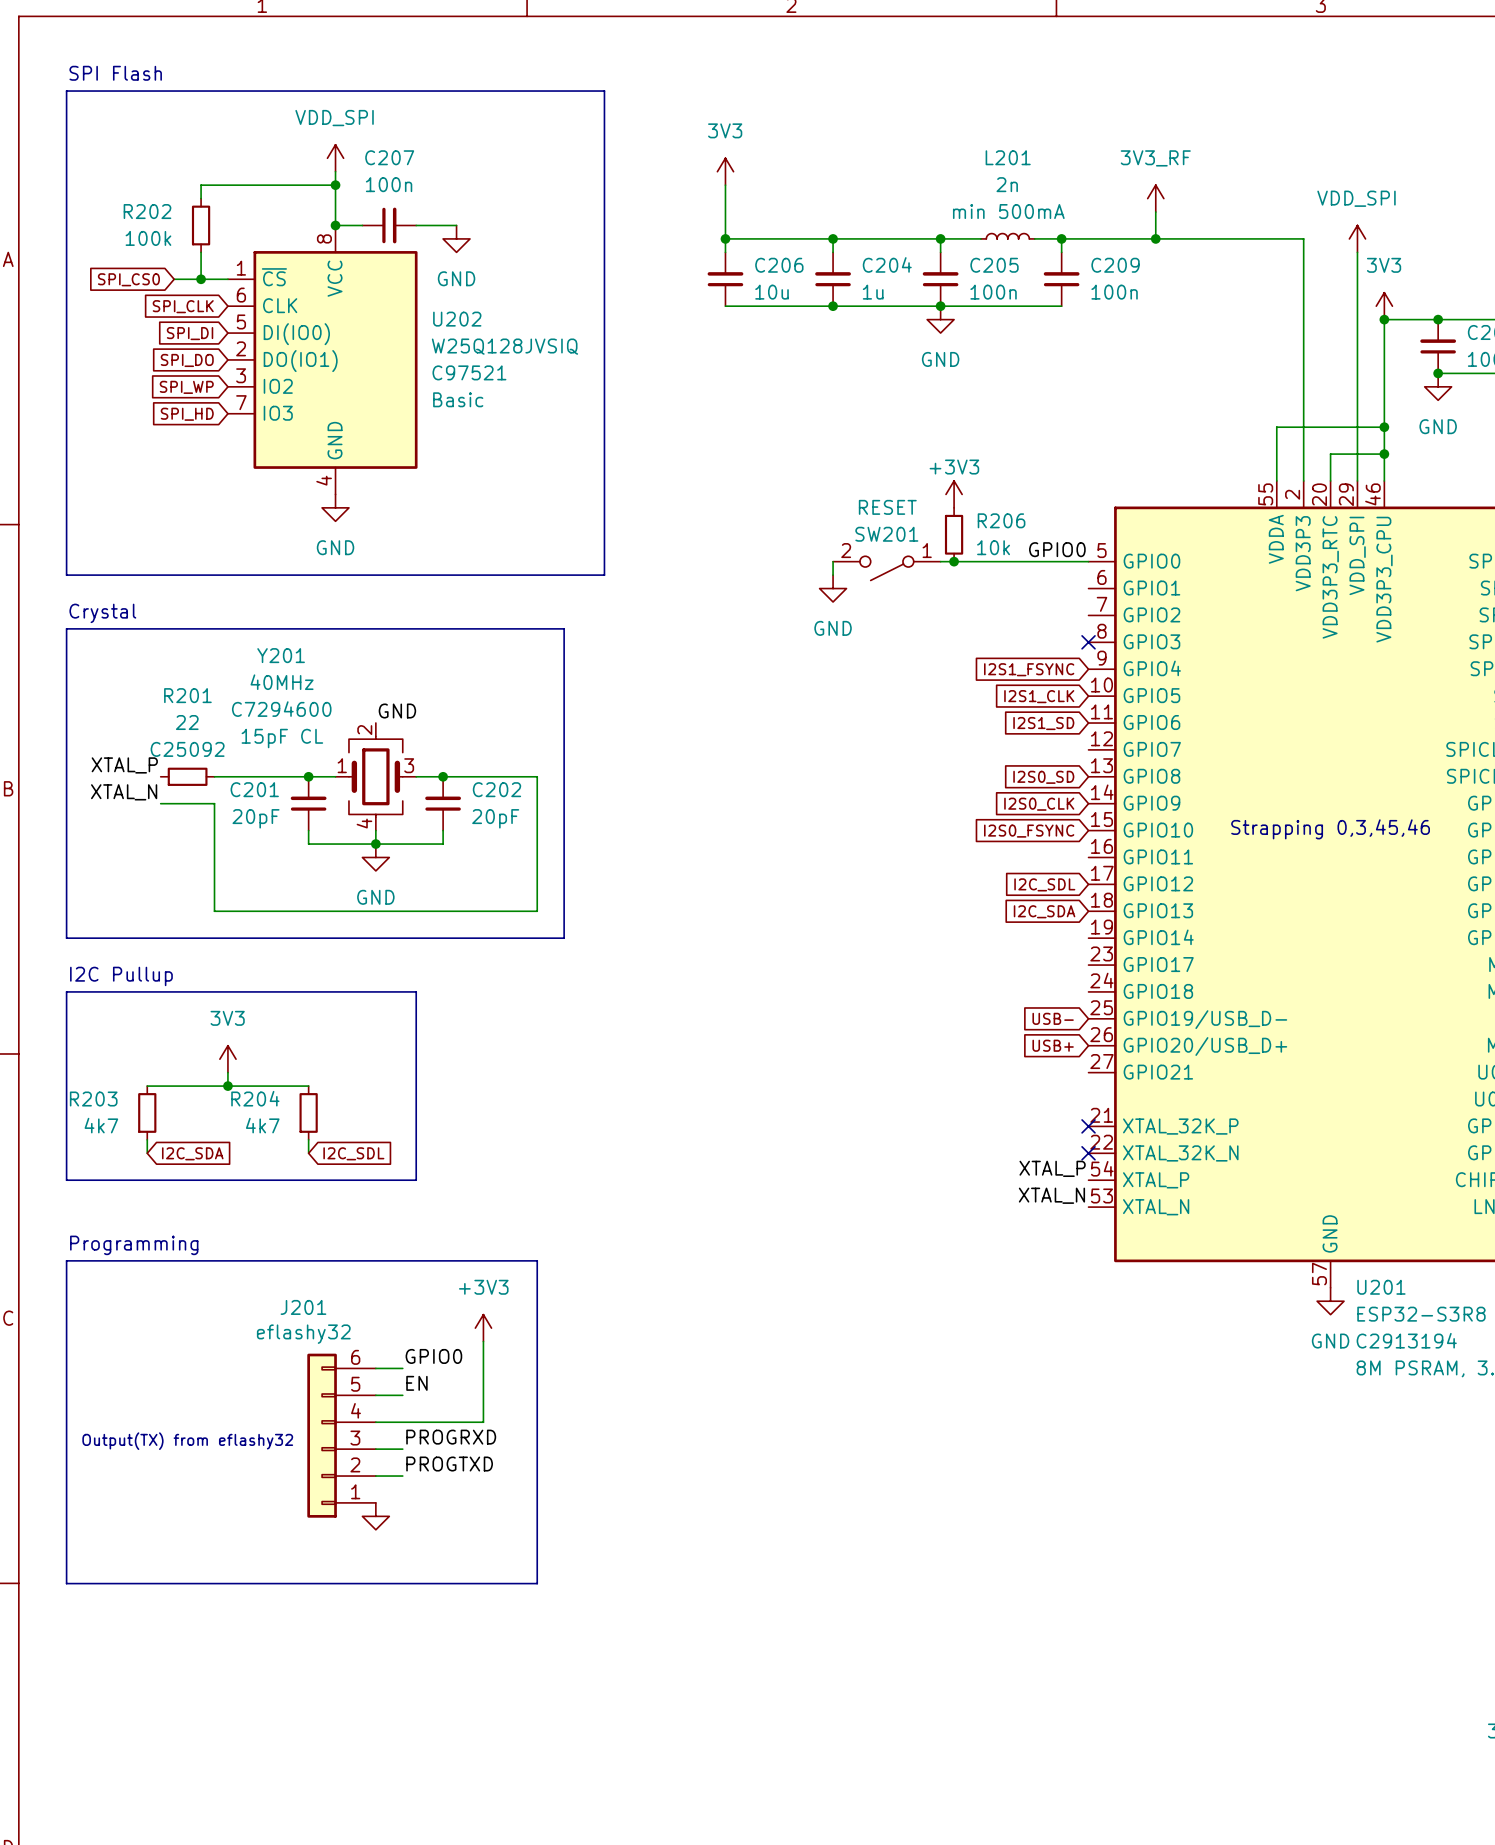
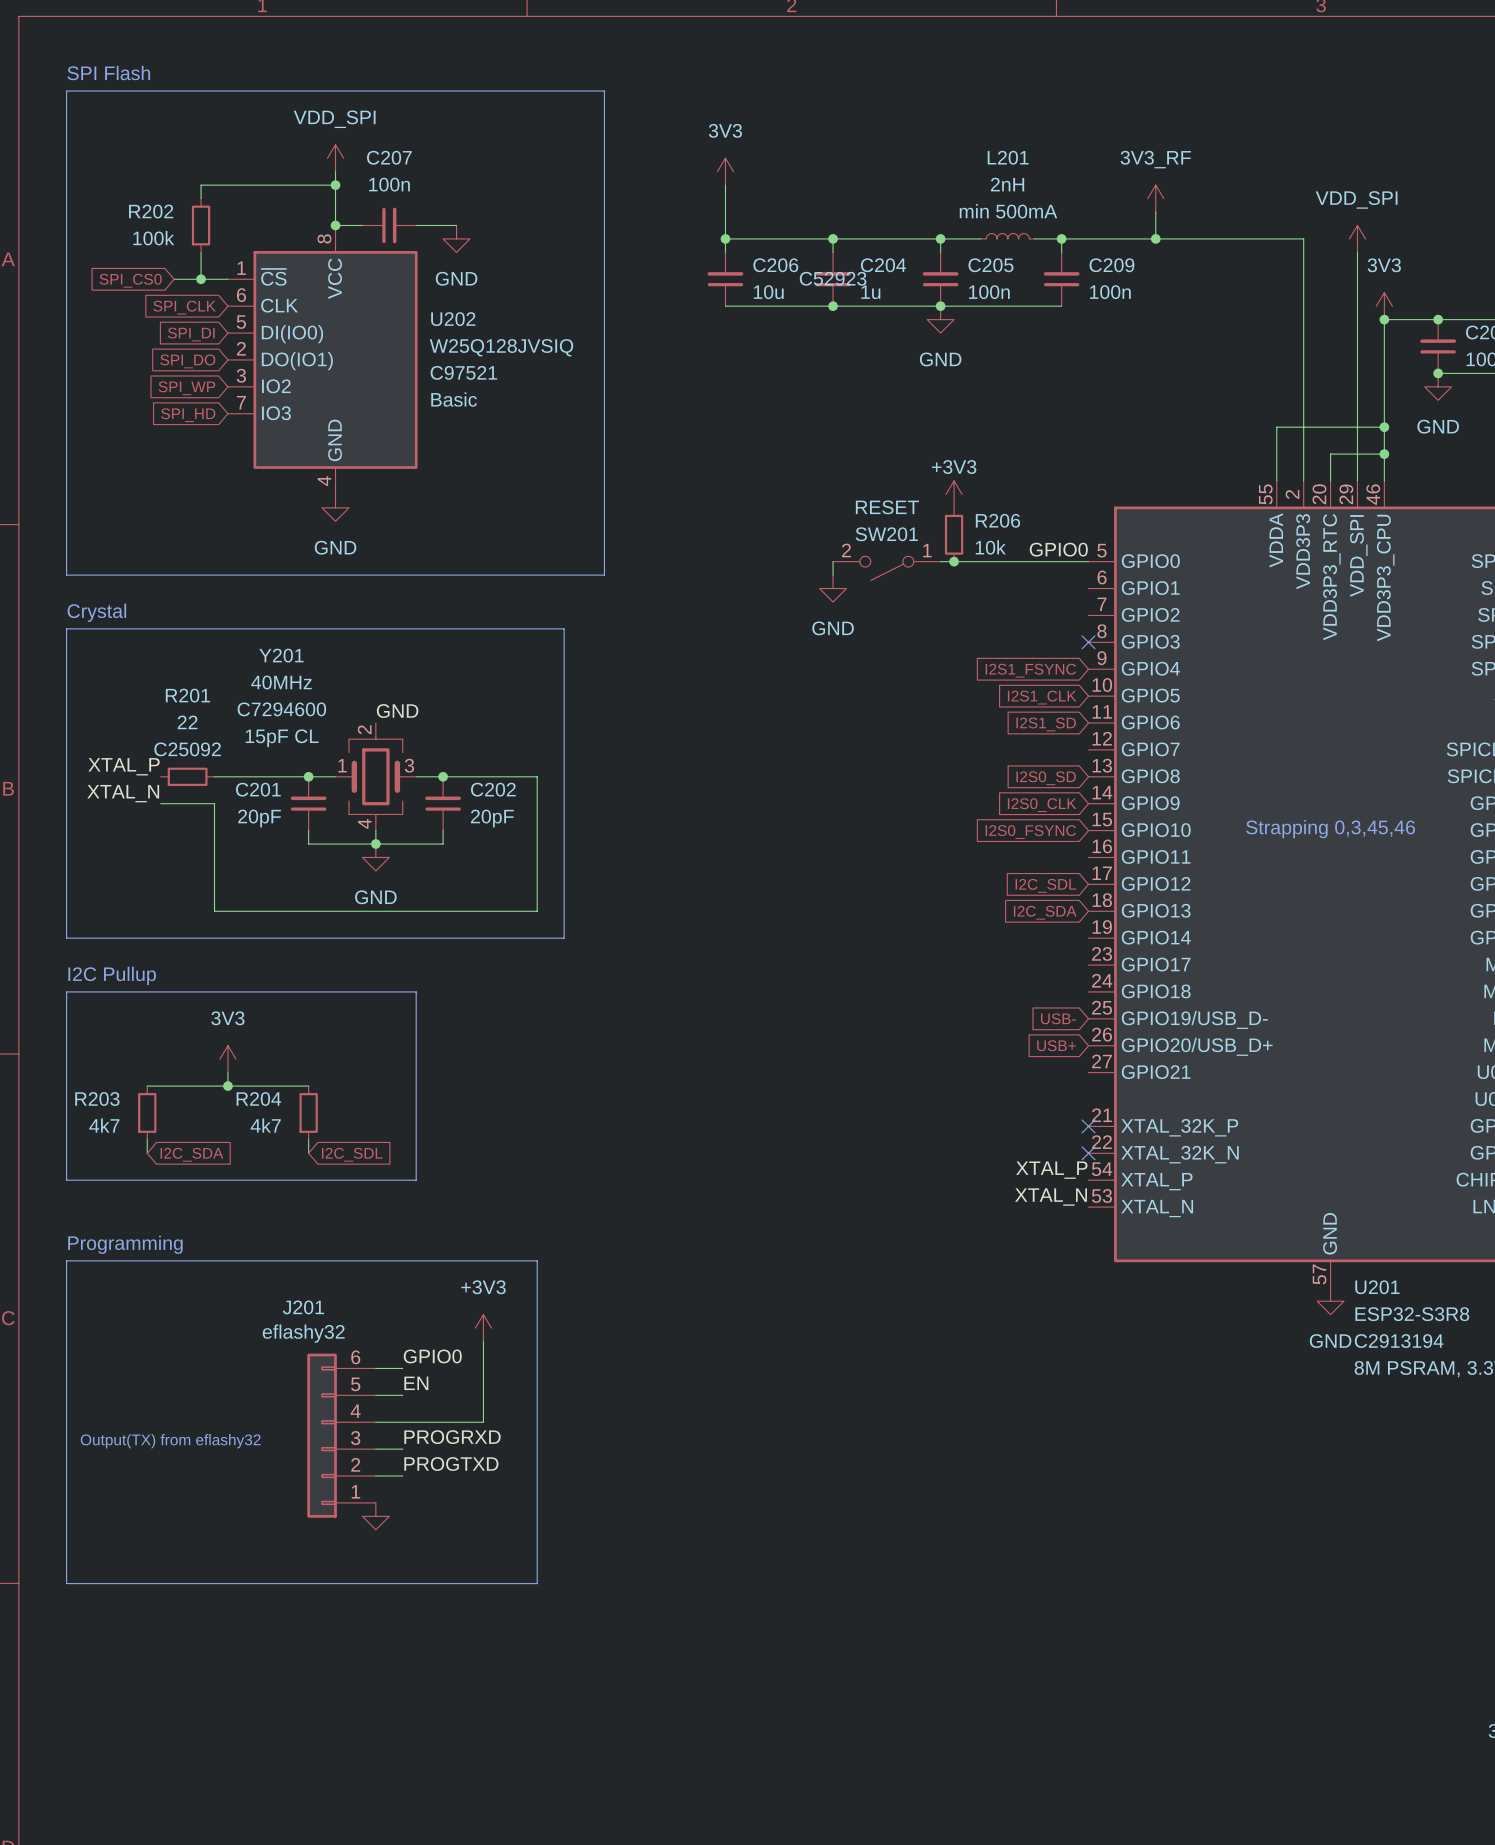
L201 value: 2n (1007, 184) -> 2nH (1007, 184)
C204 text: none -> C52923 (833, 278)

